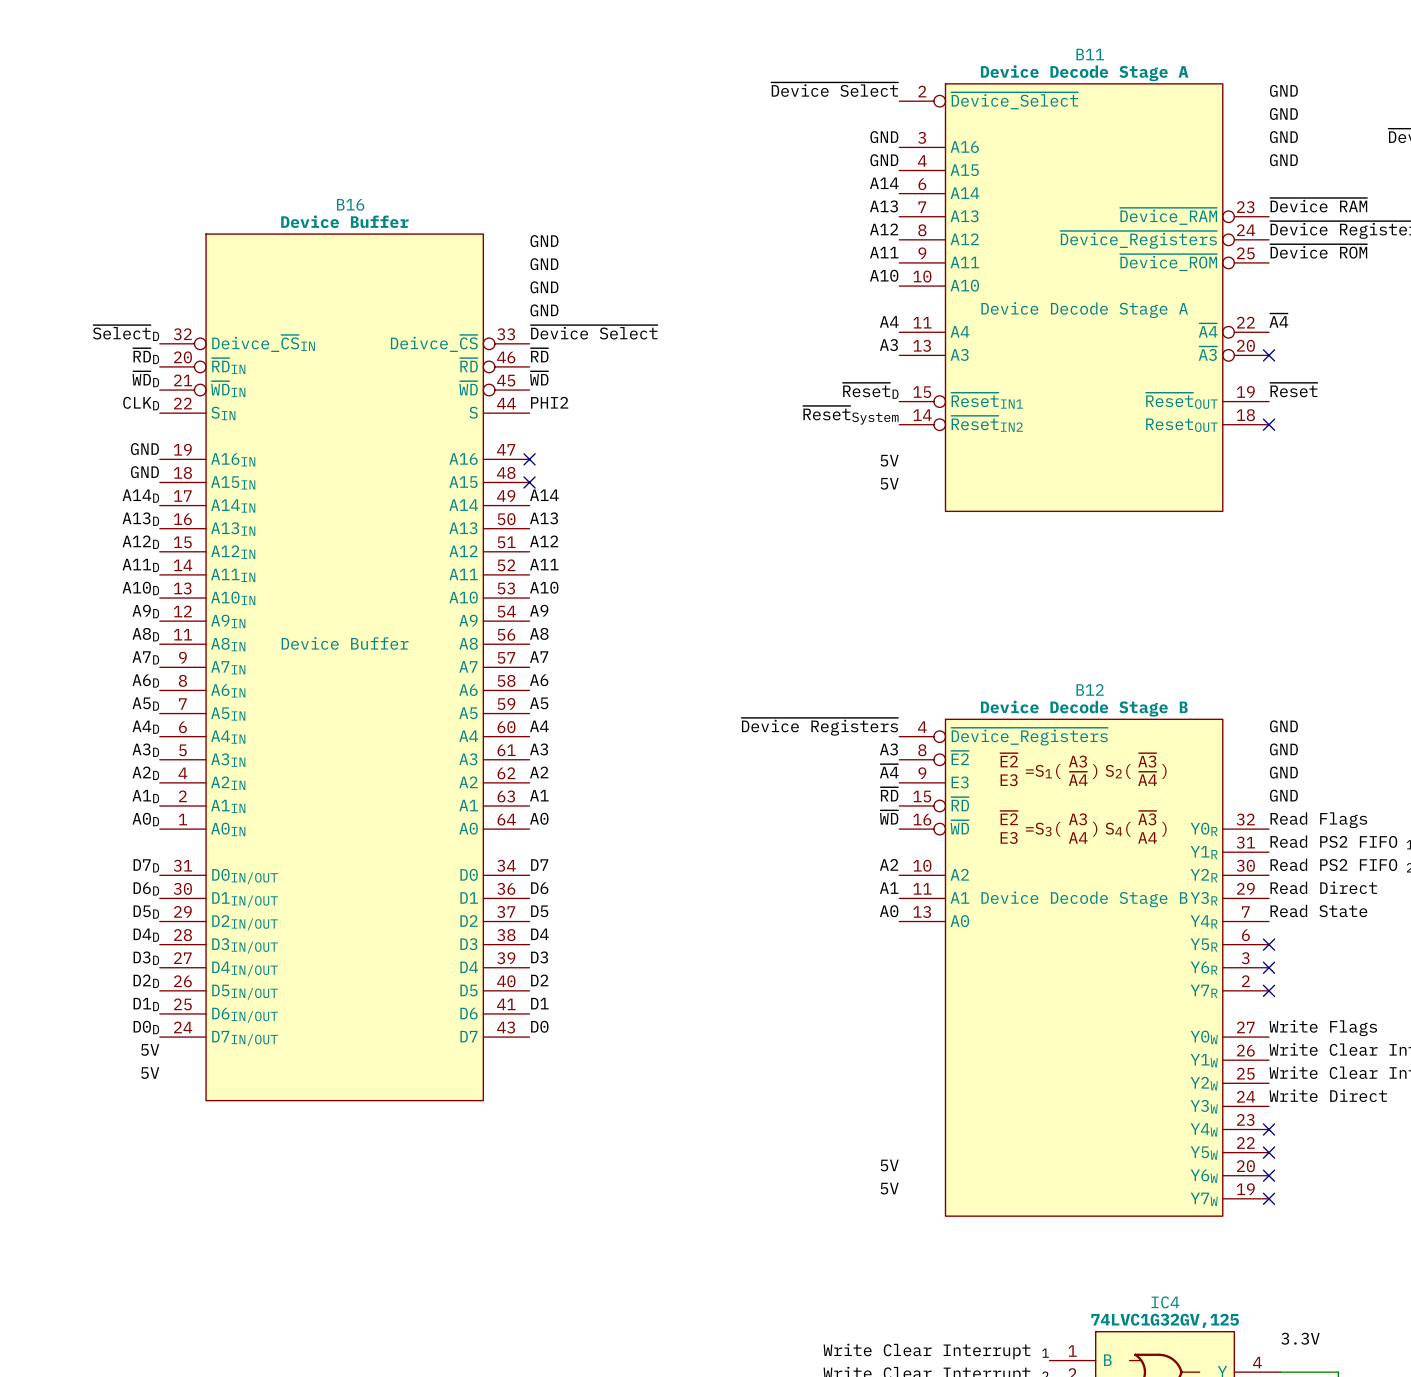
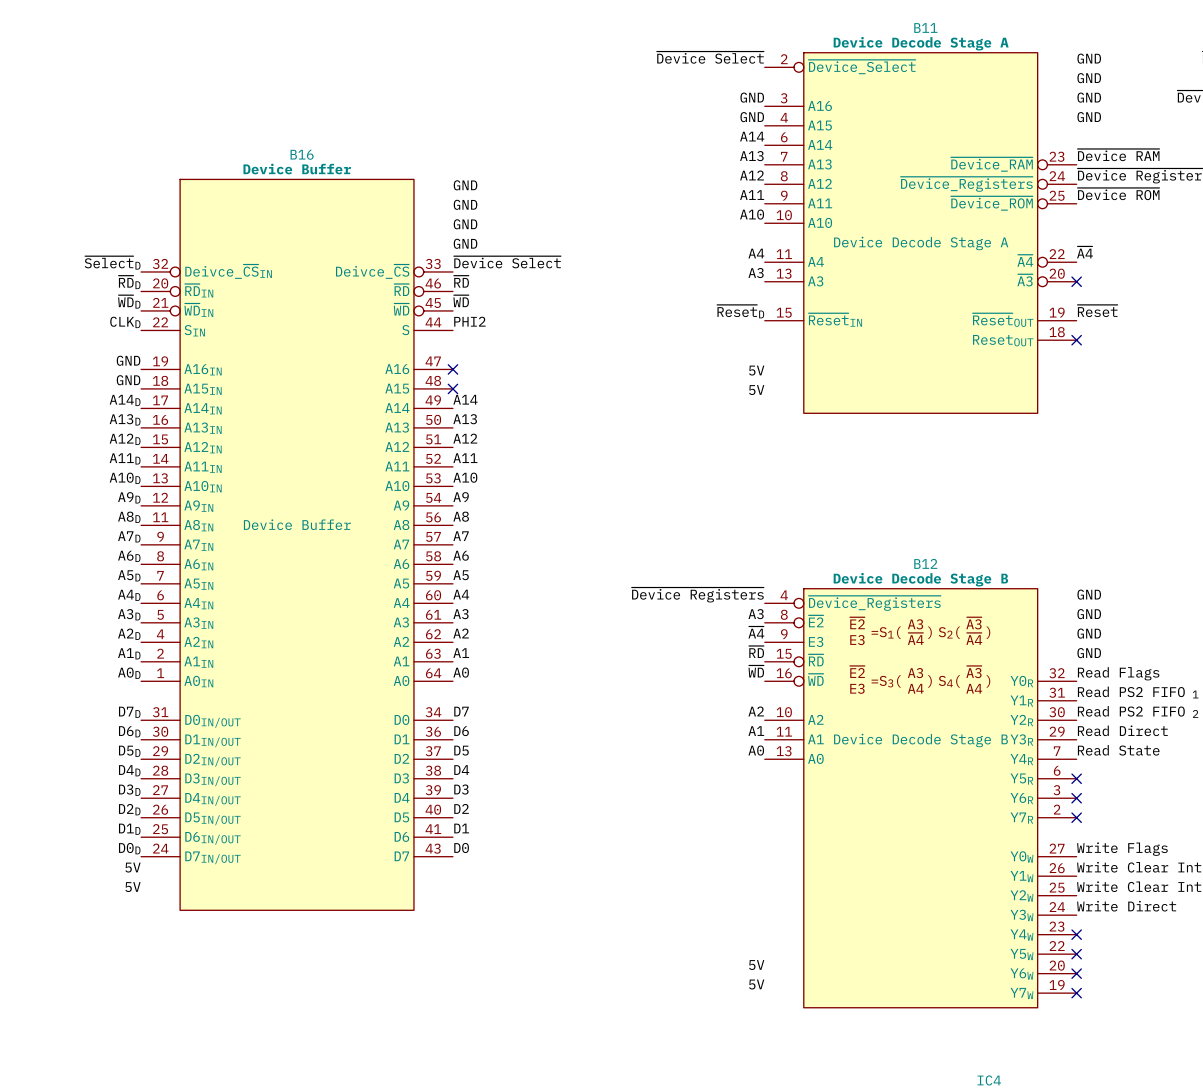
B11 symbol: [899, 83, 1270, 513] -> [764, 52, 1077, 414]
label: ~{Reset}System (850, 415) -> none

